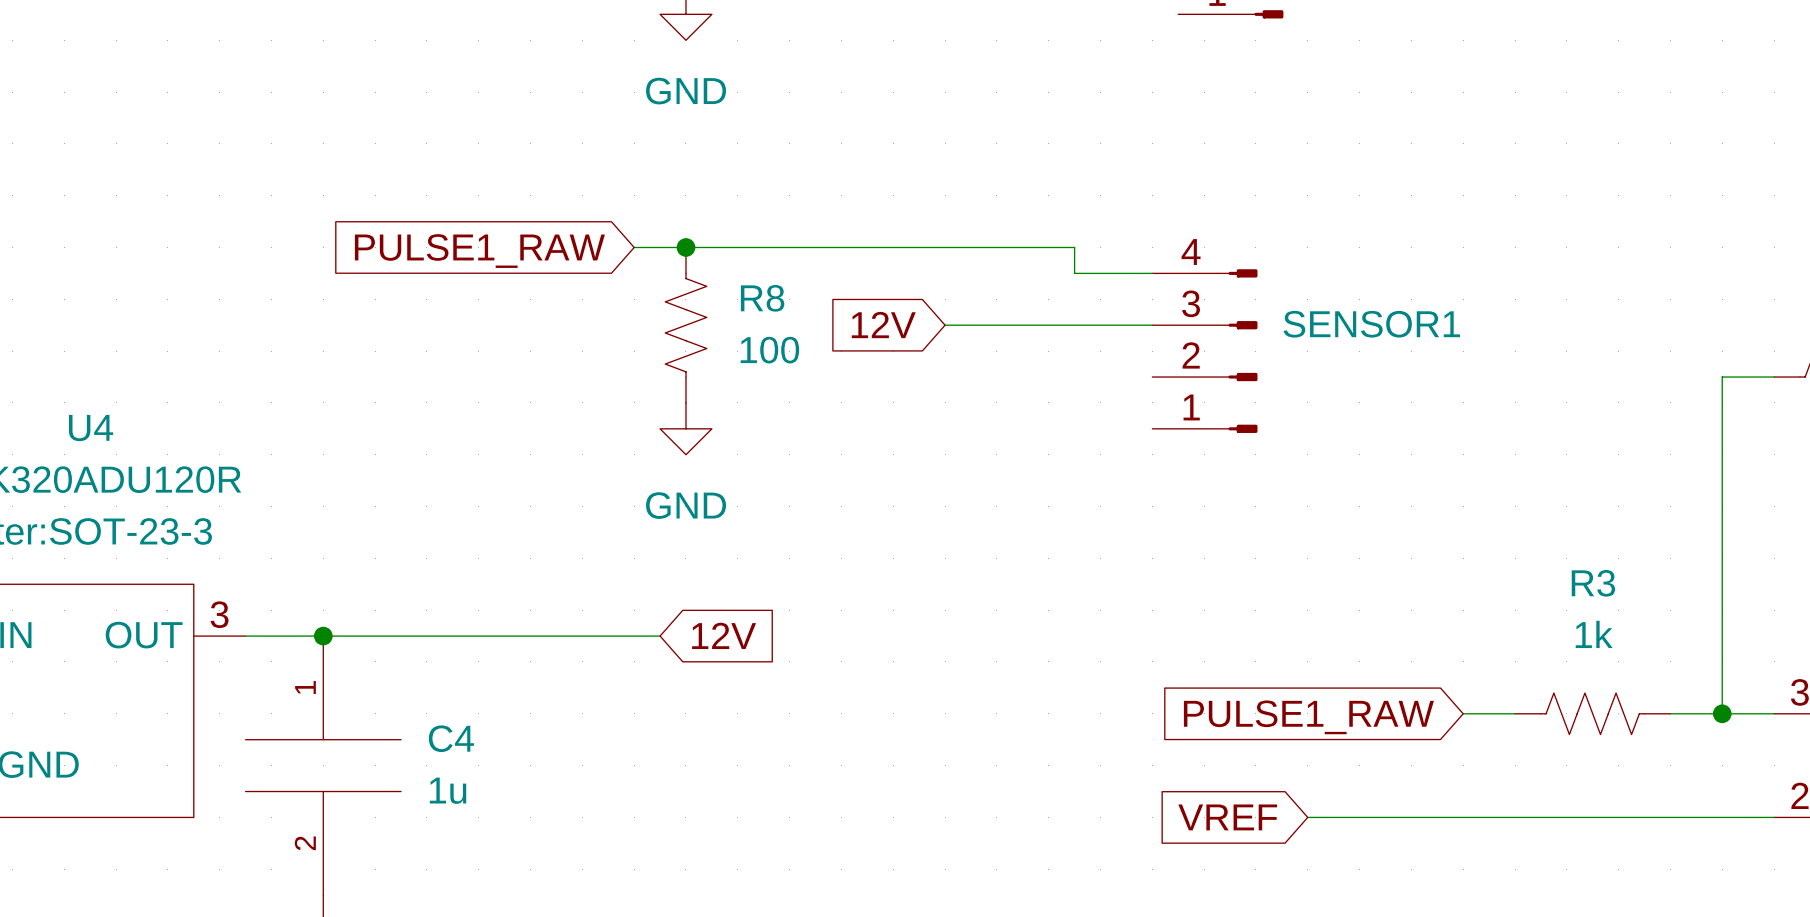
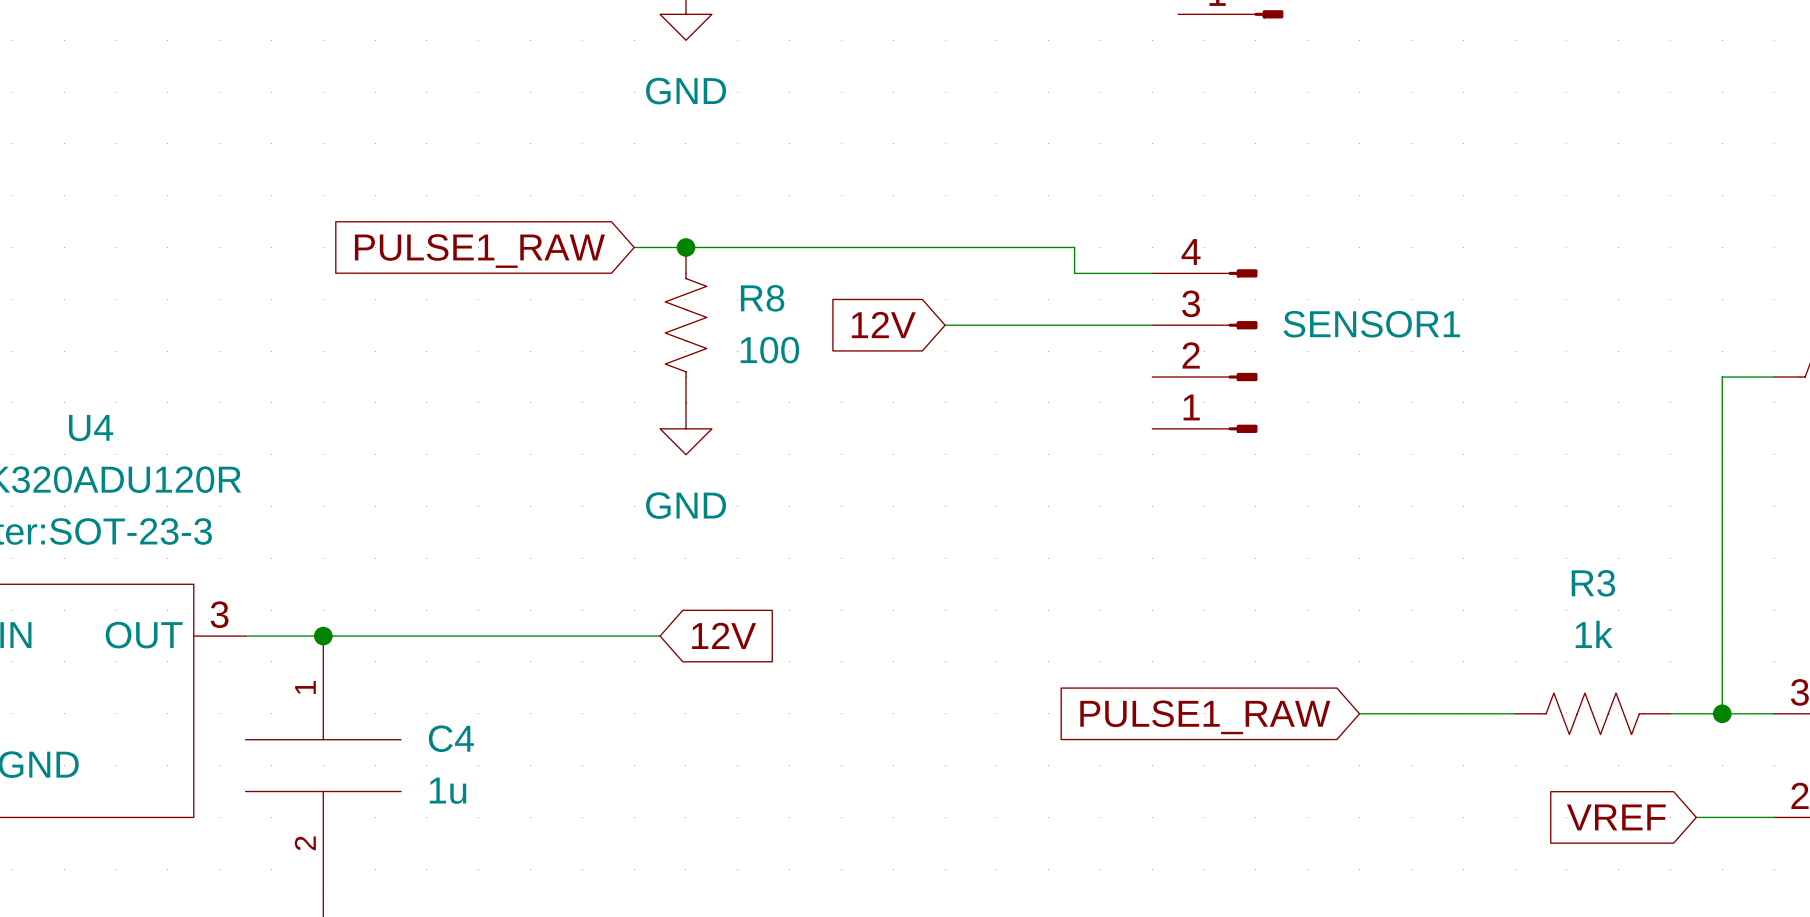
wire: none -> (1359, 713) (1463, 713)
global label position: PULSE1_RAW (1308, 717) -> PULSE1_RAW (1205, 717)
global label position: VREF (1227, 817) -> VREF (1616, 817)
wire: (1307, 817) (1696, 817) -> none

